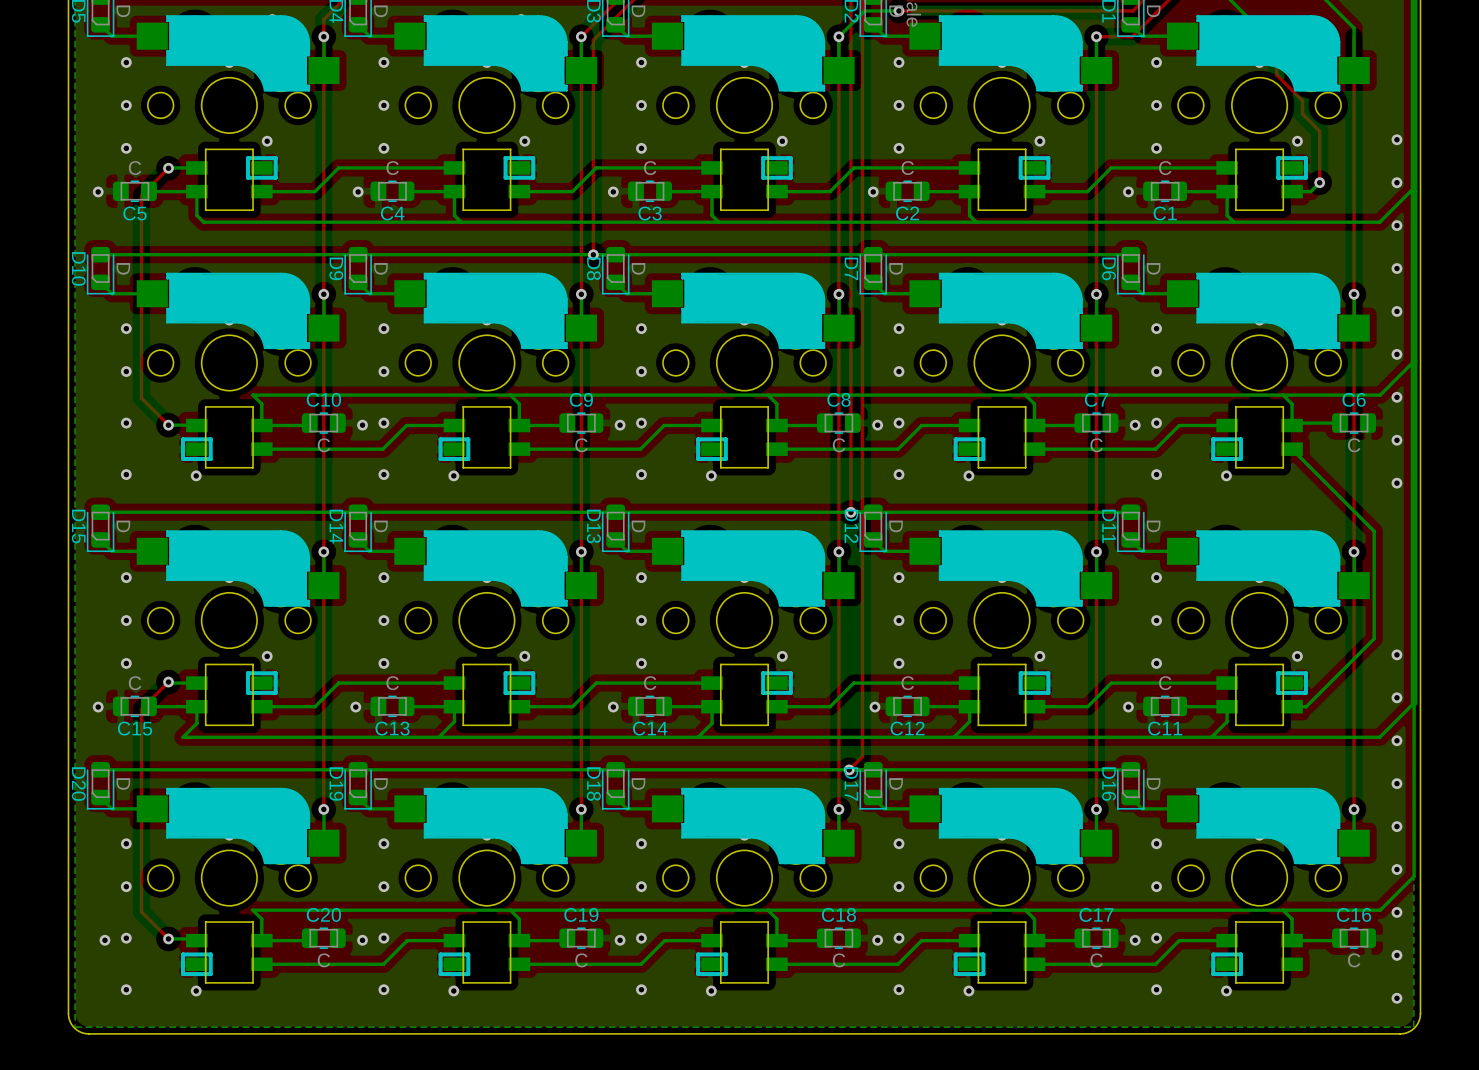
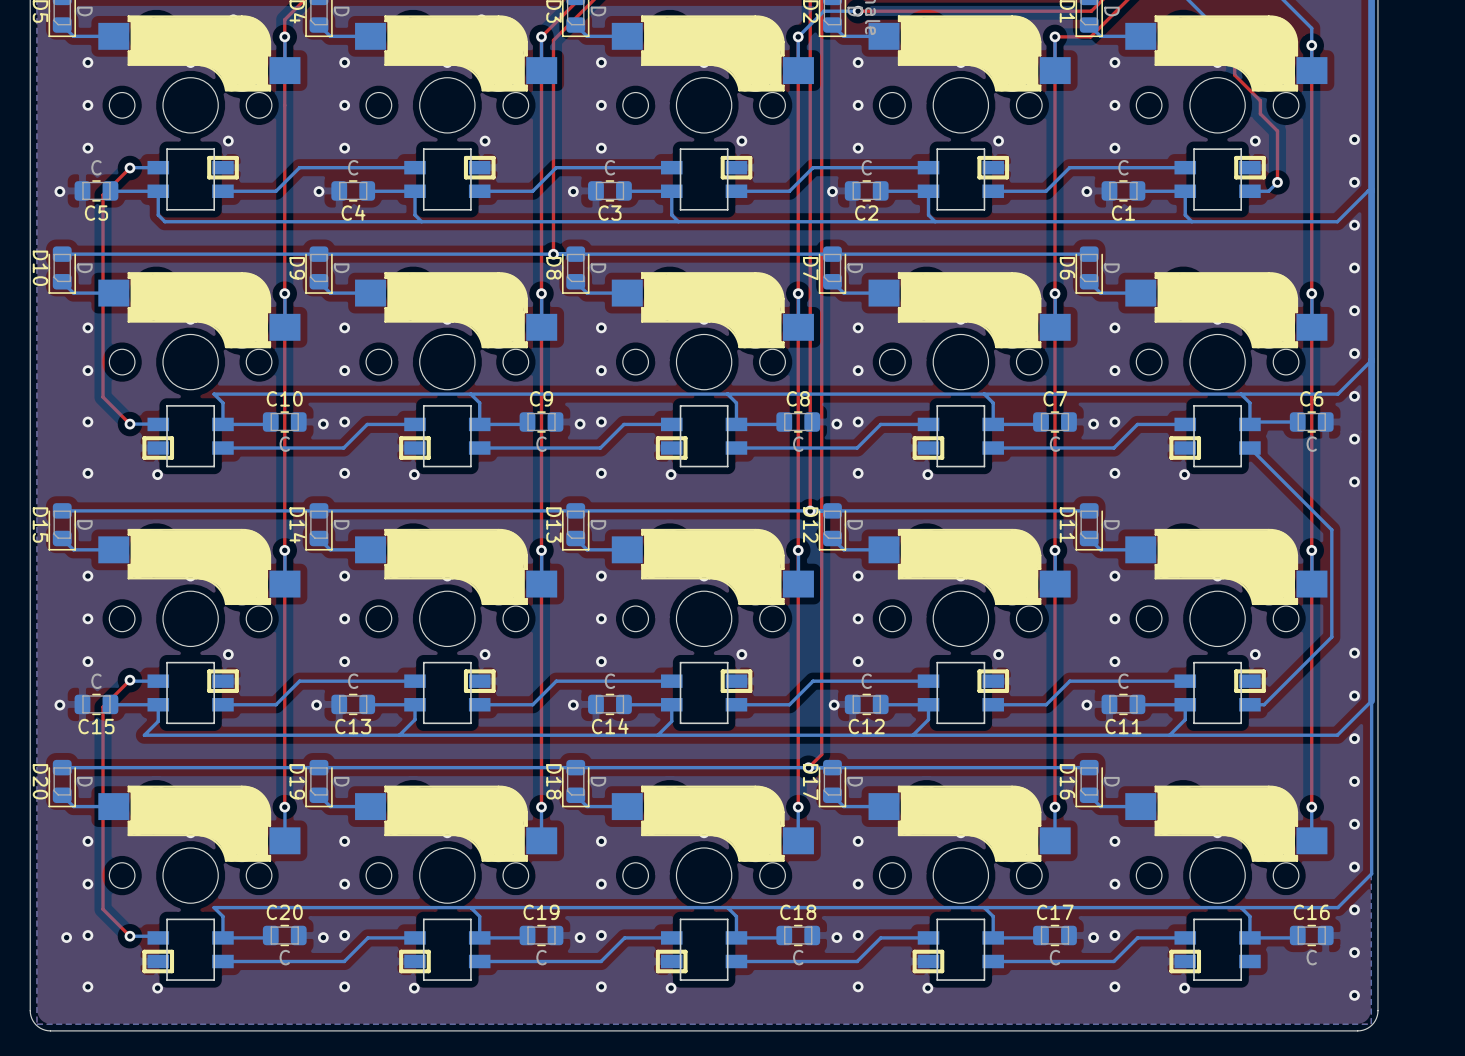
via: none -> (1311, 45)

